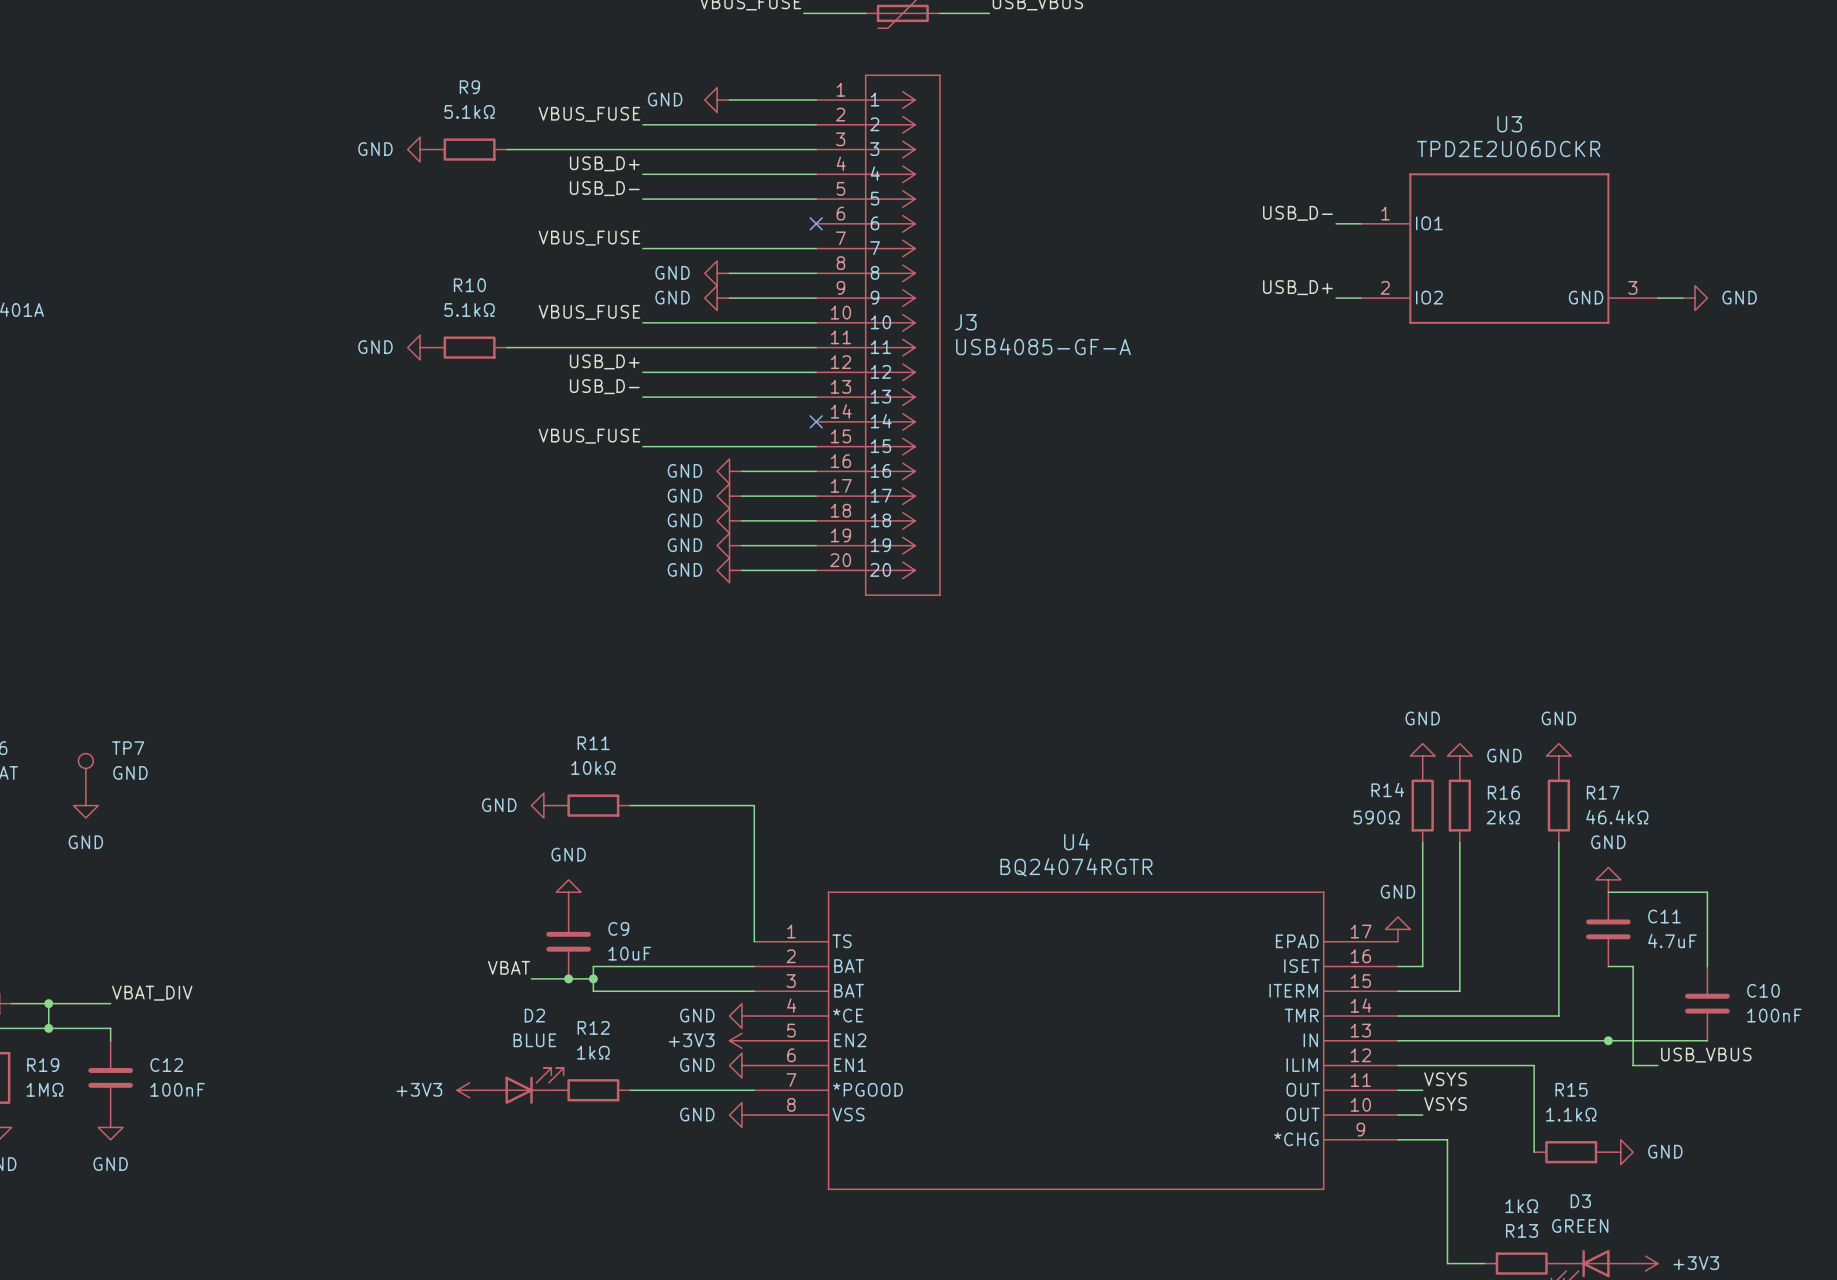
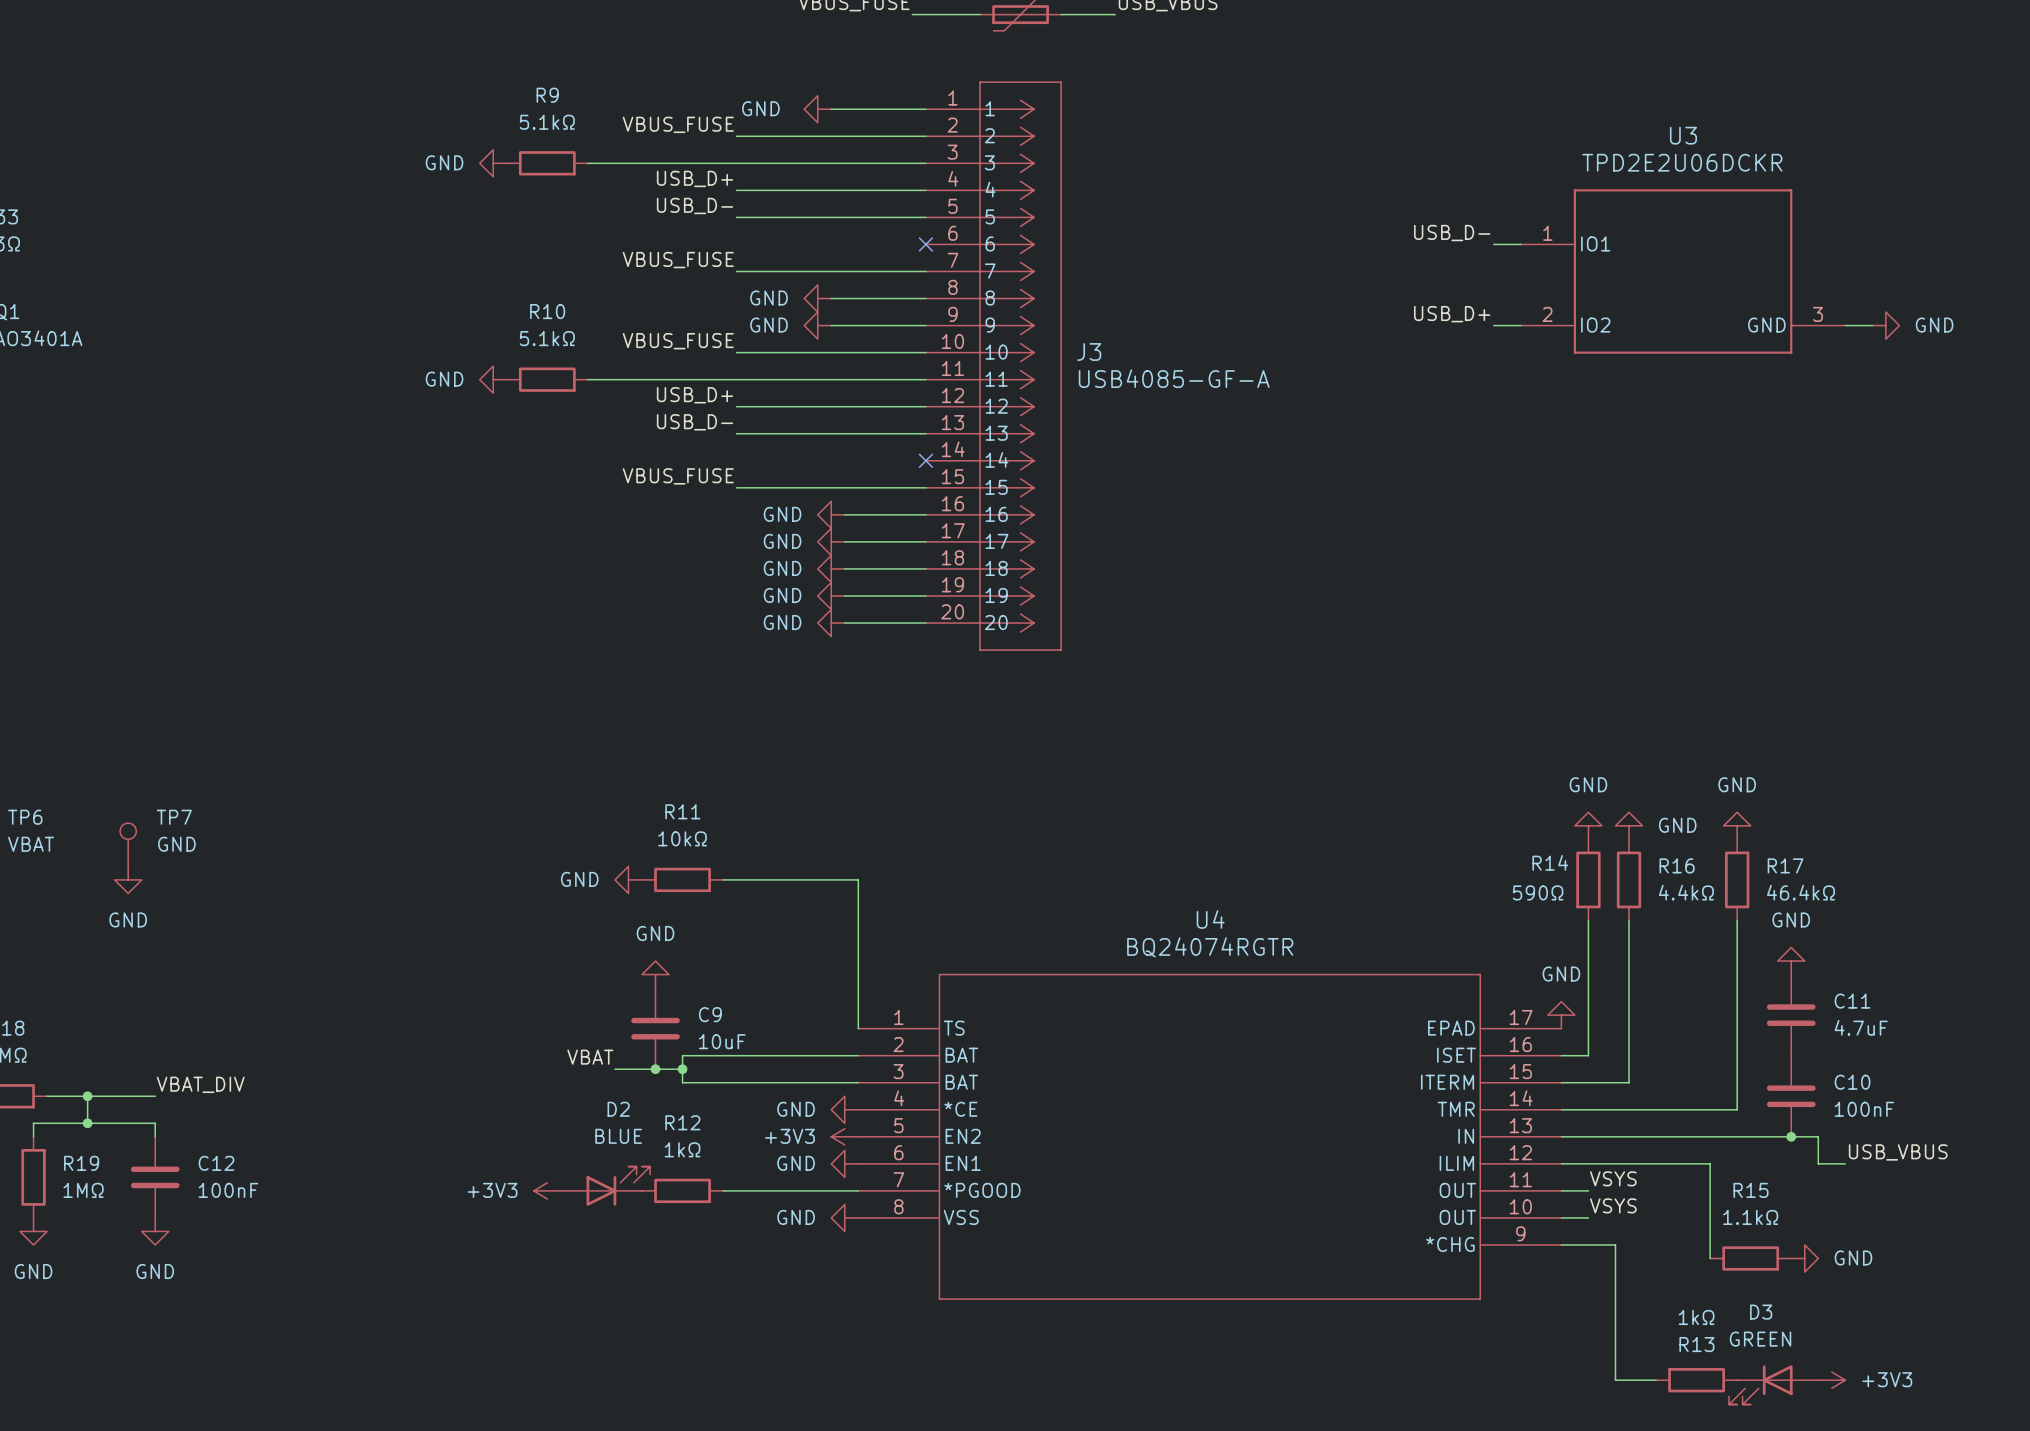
R16 value: 2kΩ (1503, 817) -> 4.4kΩ (1686, 892)
wire: (1608, 892) (1707, 892) (1707, 966) -> none
wire: (1608, 966) (1633, 966) (1633, 1040) (1707, 1040) -> none
C10 position: (1707, 1003) -> (1791, 1096)

